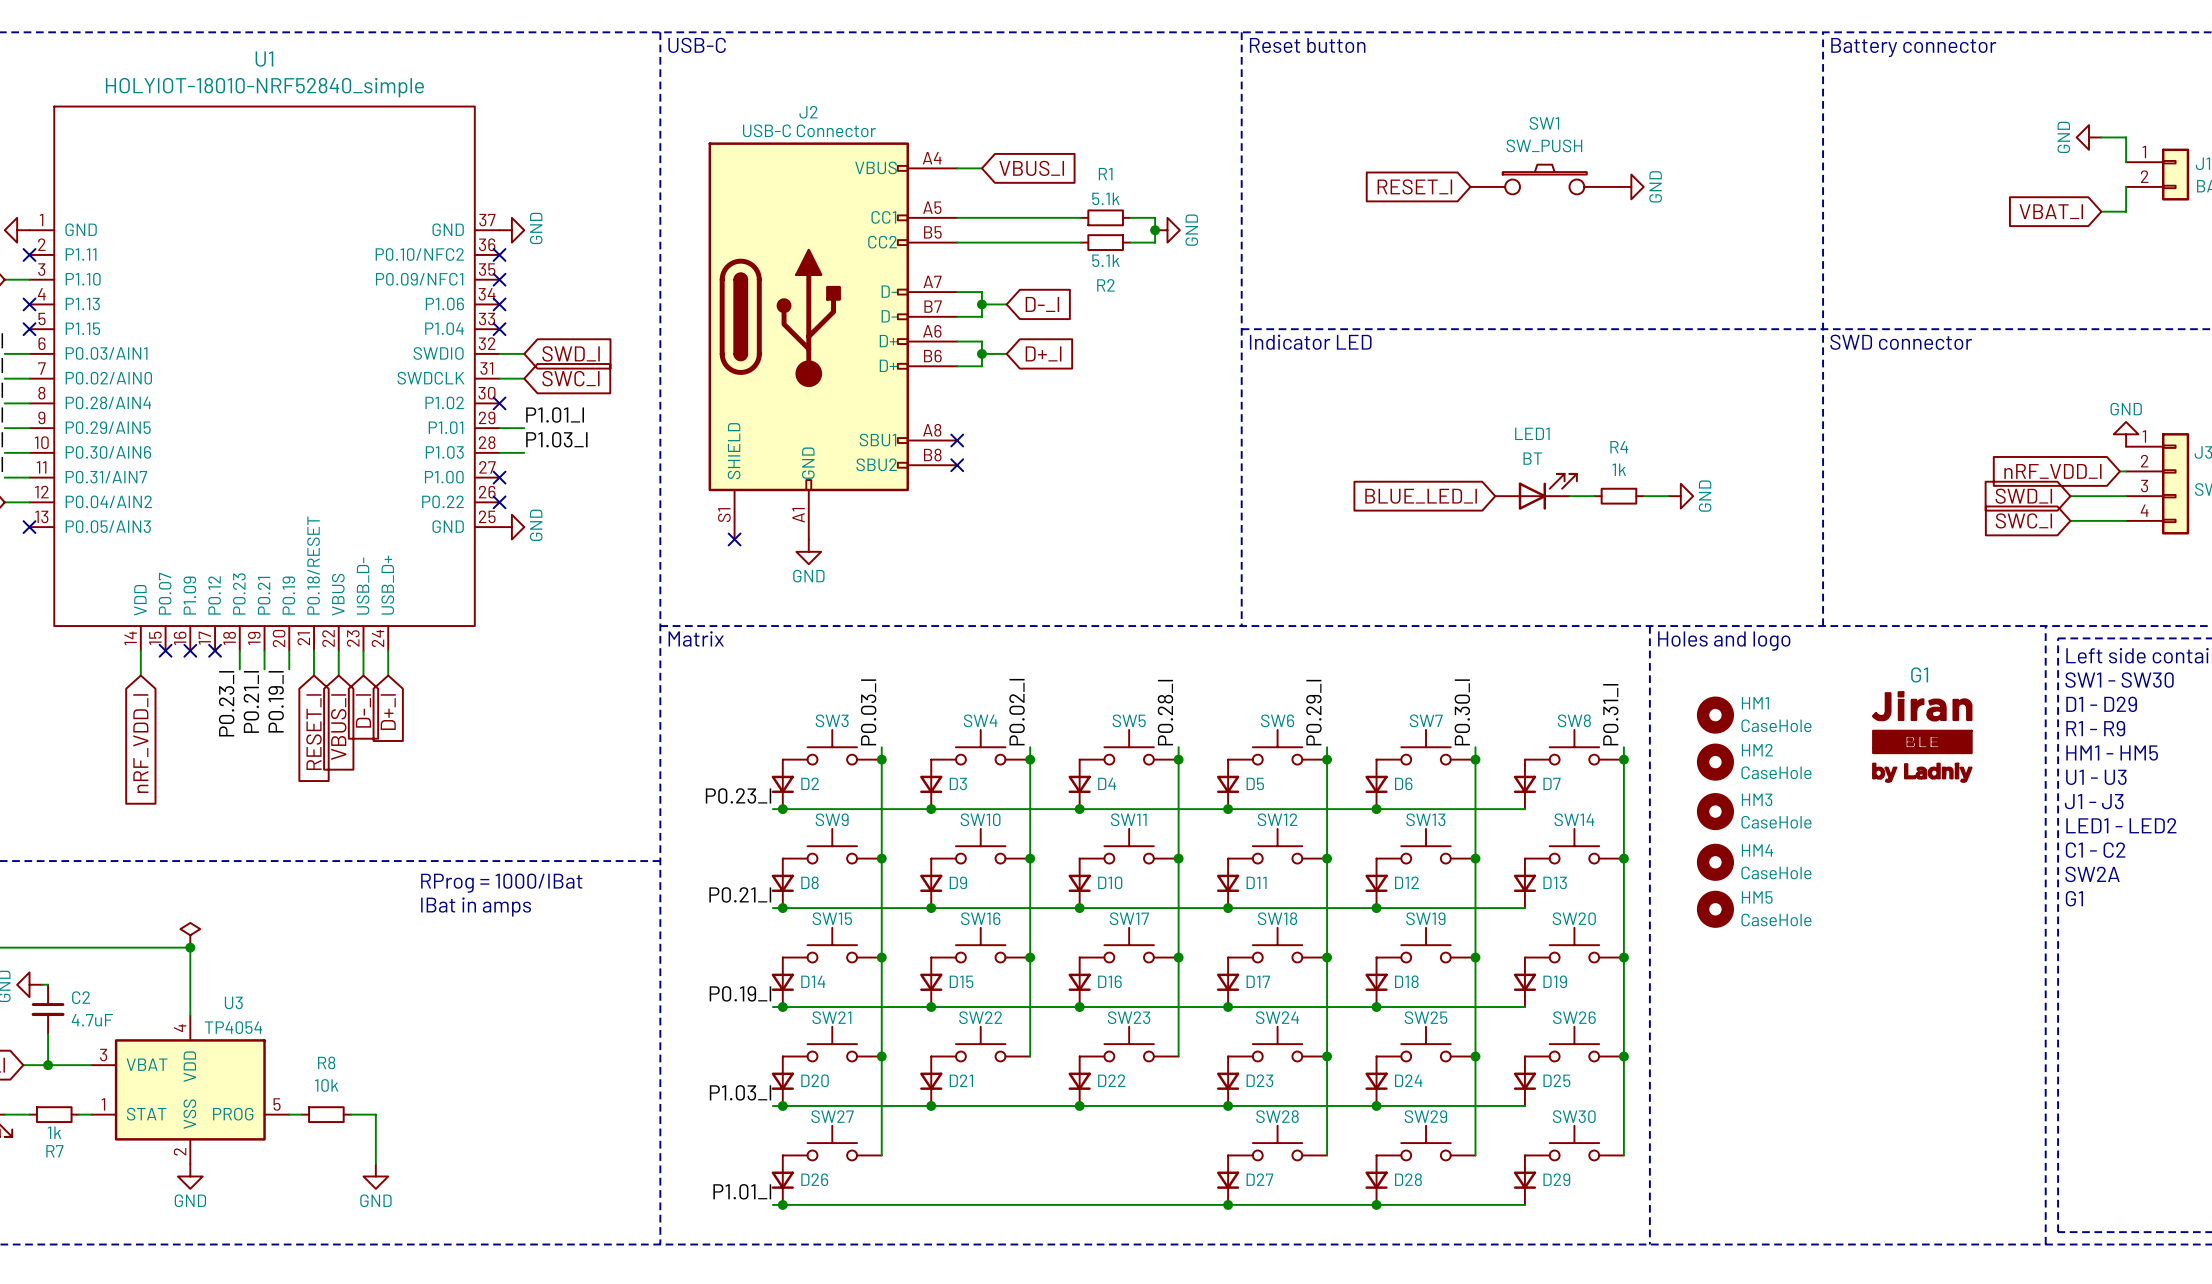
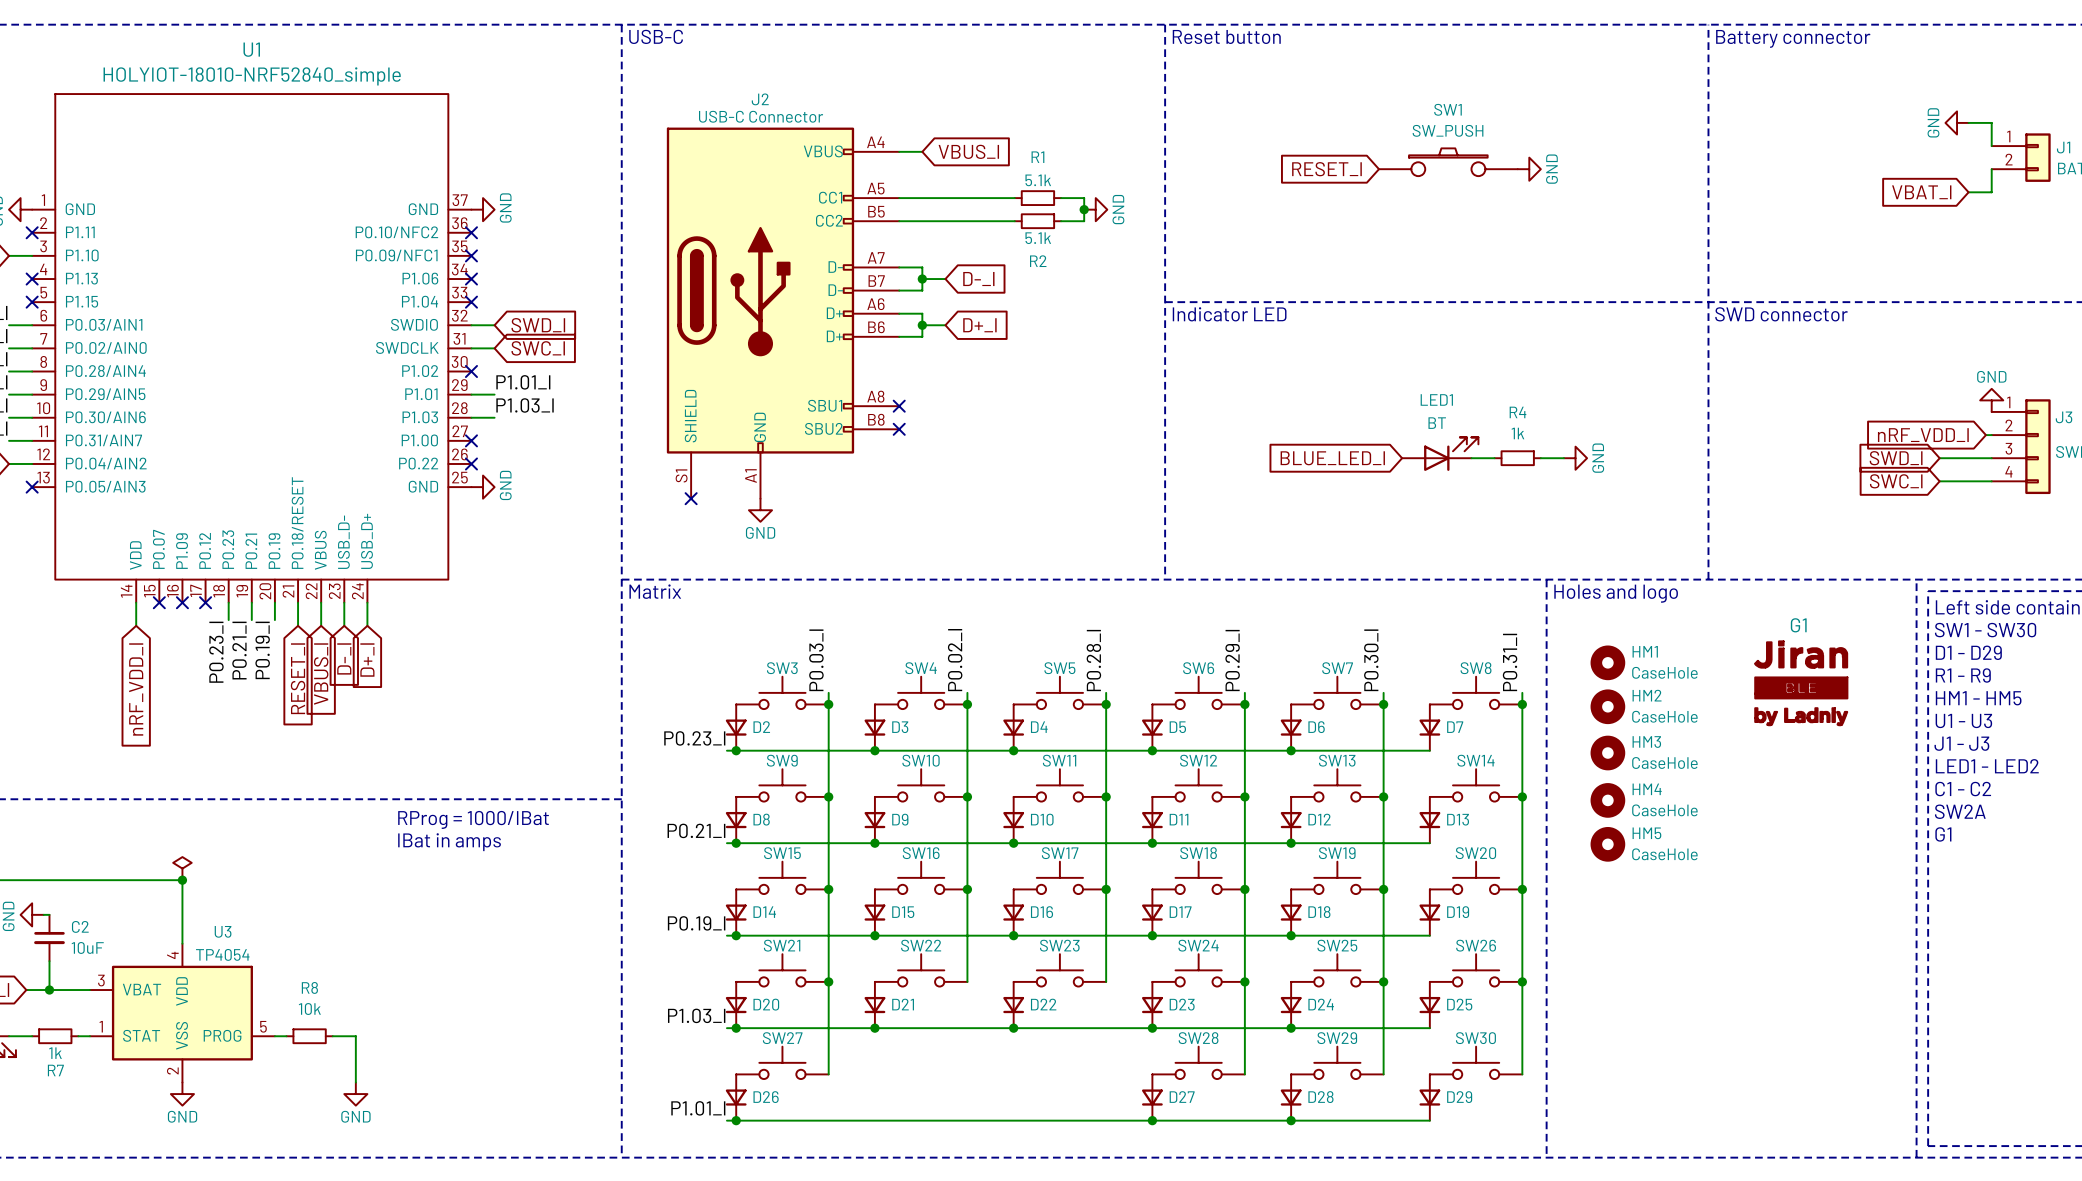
C2 value: 4.7uF (92, 1020) -> 10uF (87, 947)

